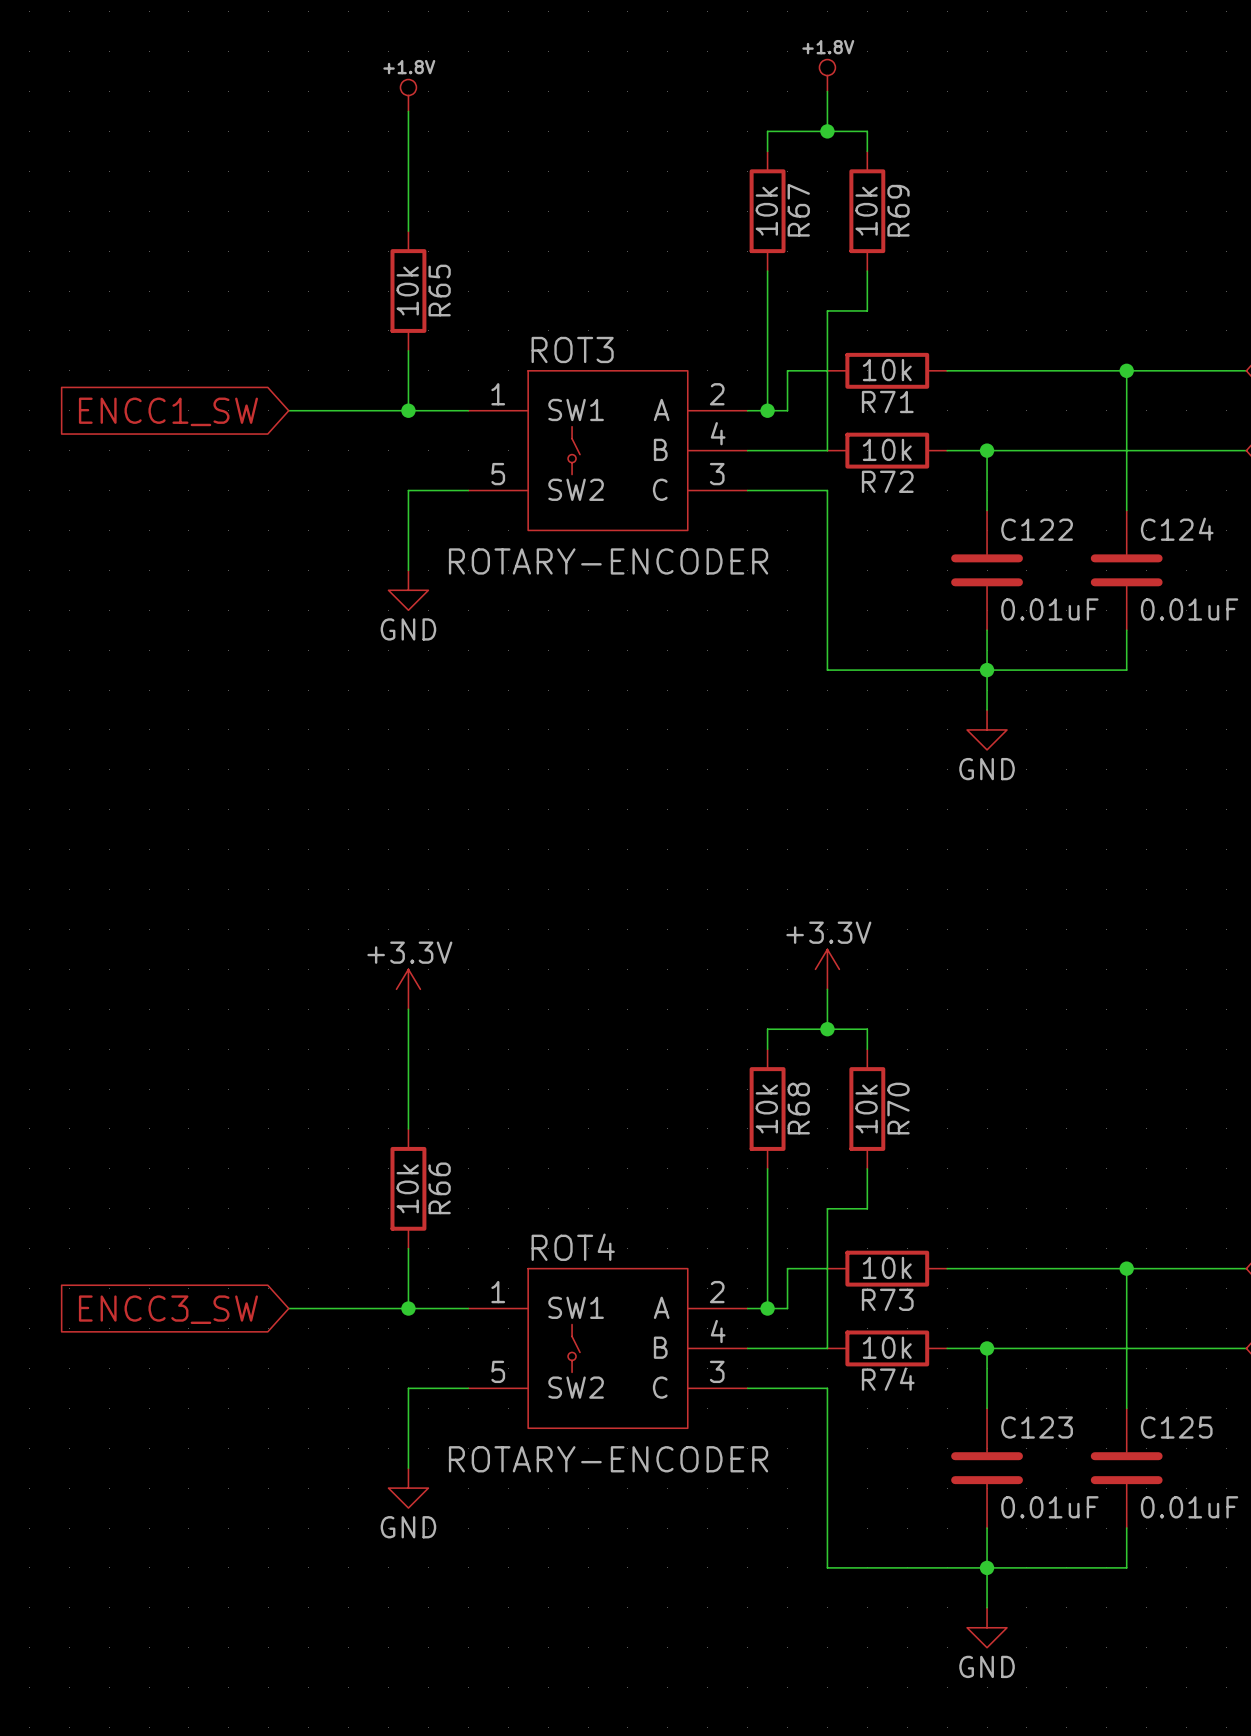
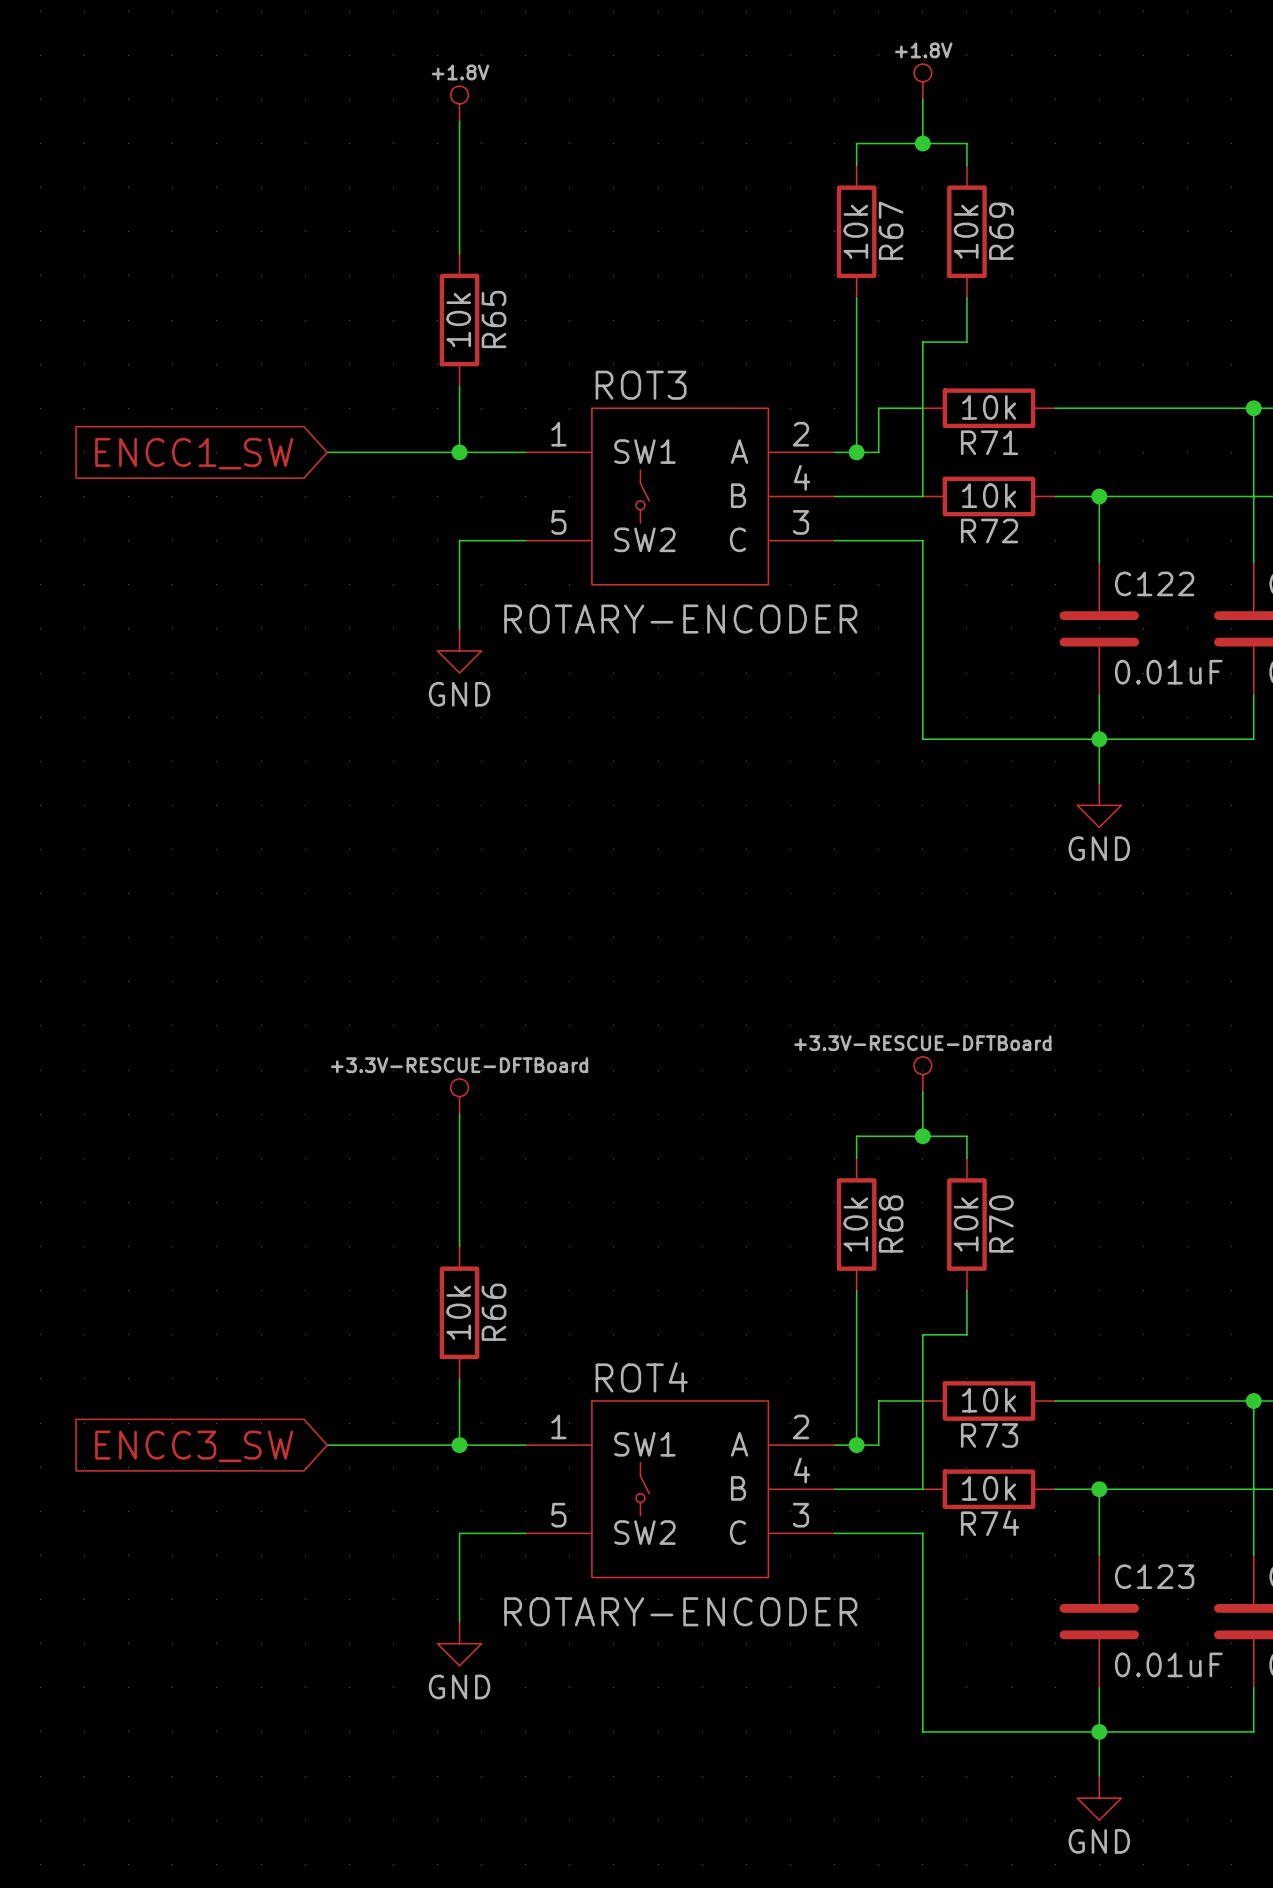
power symbol: +3.3V (827, 969) -> +3.3V-RESCUE-DFTBoard (922, 1074)
power symbol: +3.3V (408, 989) -> +3.3V-RESCUE-DFTBoard (459, 1096)

